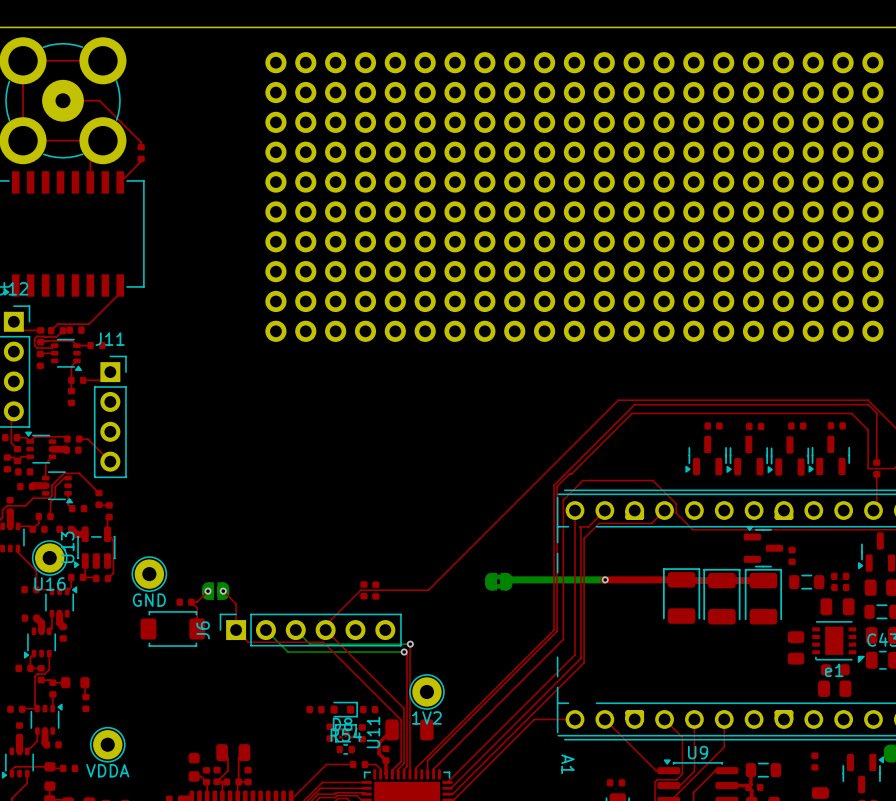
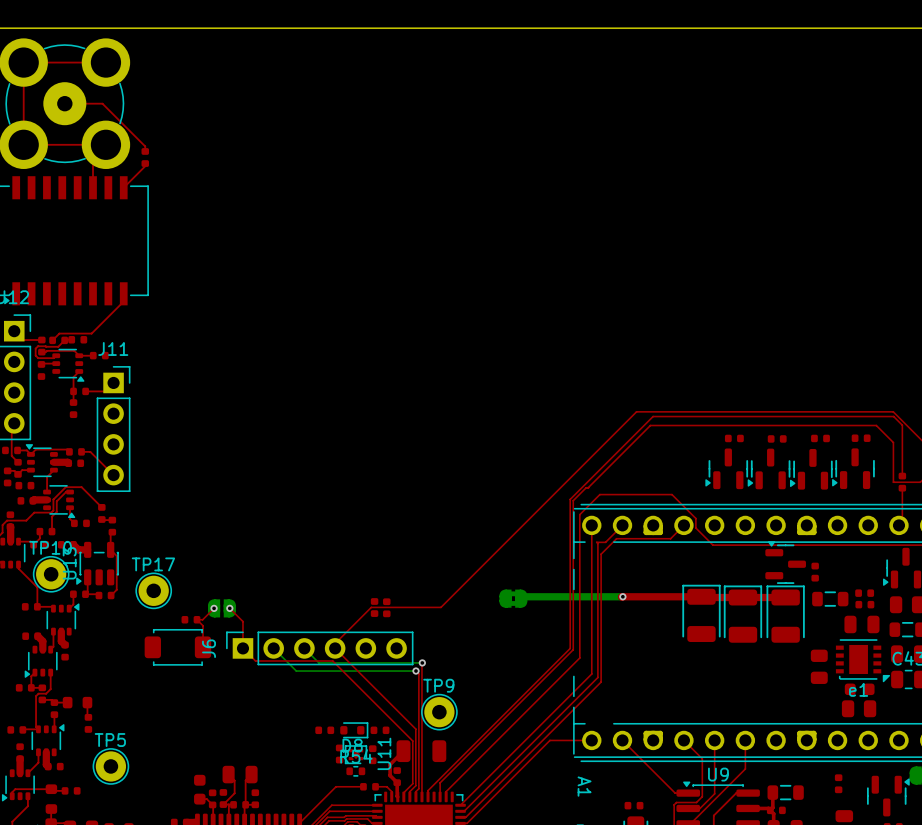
part: (574, 196) -> none
TP10 name: none -> TP10 (50, 547)
TP17 name: none -> TP17 (153, 564)
TP10 value: U16 (49, 584) -> none
TP17 value: GND (149, 600) -> none
TP9 name: none -> TP9 (438, 685)
TP9 value: 1V2 (426, 717) -> none
TP5 name: none -> TP5 (110, 740)
TP5 value: VDDA (107, 770) -> none

